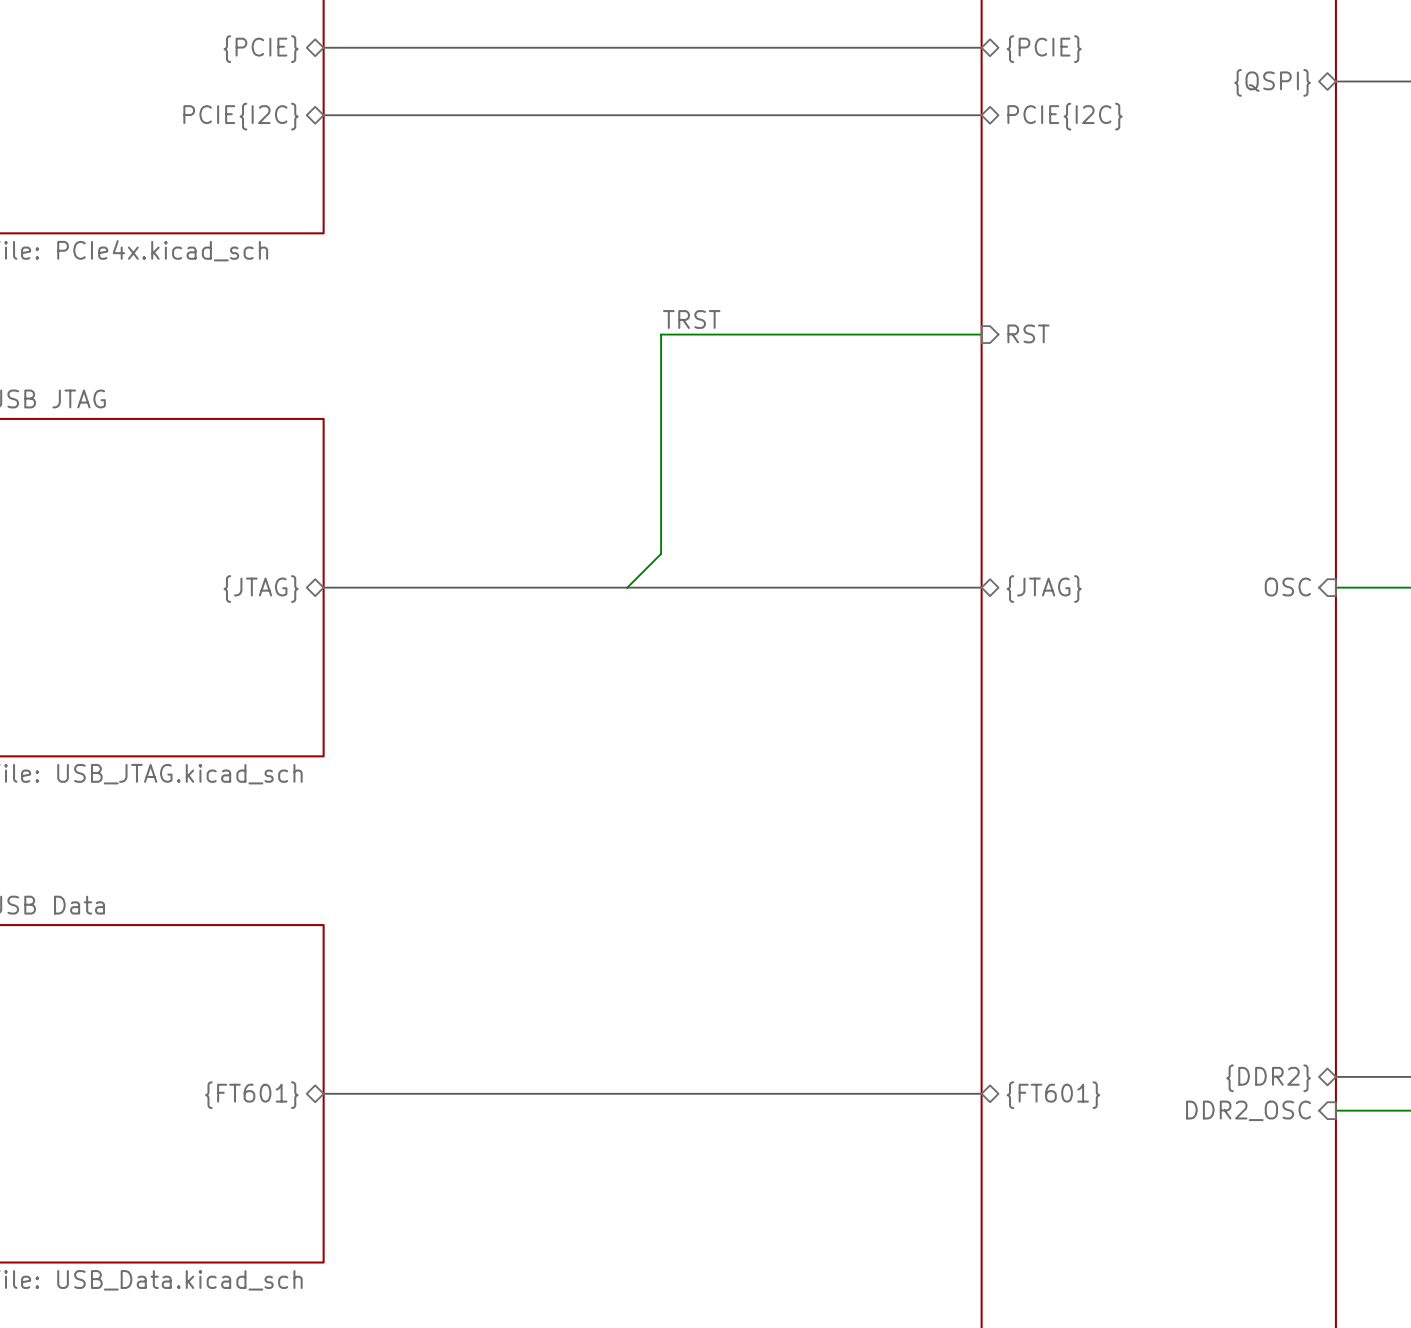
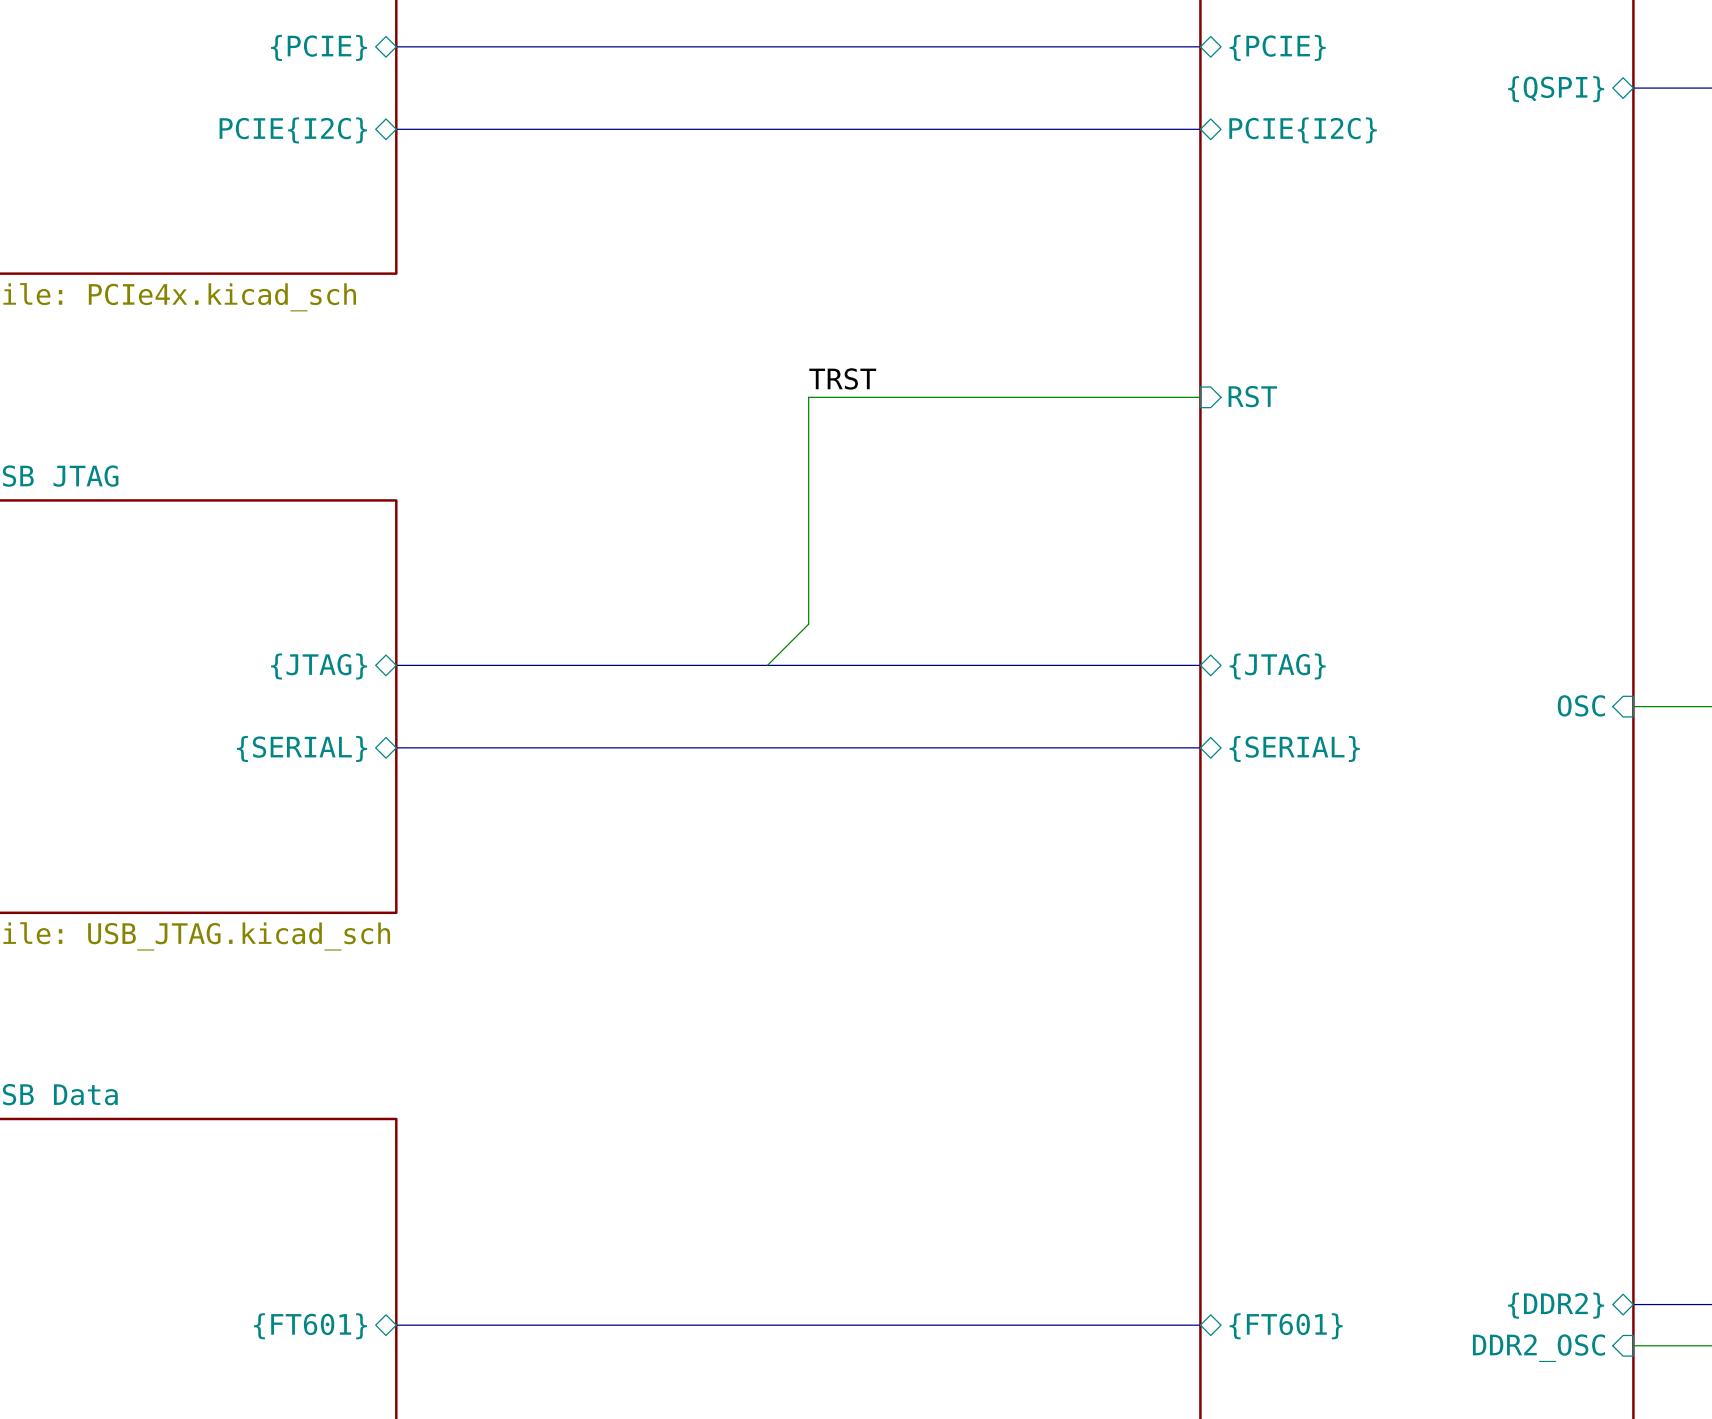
wire: (661, 520) (661, 553) (627, 587) -> (808, 624) (767, 665)
bus: none -> (396, 665) (1200, 665)
bus: (323, 587) (981, 587) -> (396, 747) (1200, 747)
sheet pin position: {JTAG} (261, 589) -> {JTAG} (319, 666)
sheet pin position: {JTAG} (1044, 589) -> {JTAG} (1277, 666)
sheet pin: none -> {SERIAL} (302, 748)
sheet pin: none -> {SERIAL} (1294, 748)

